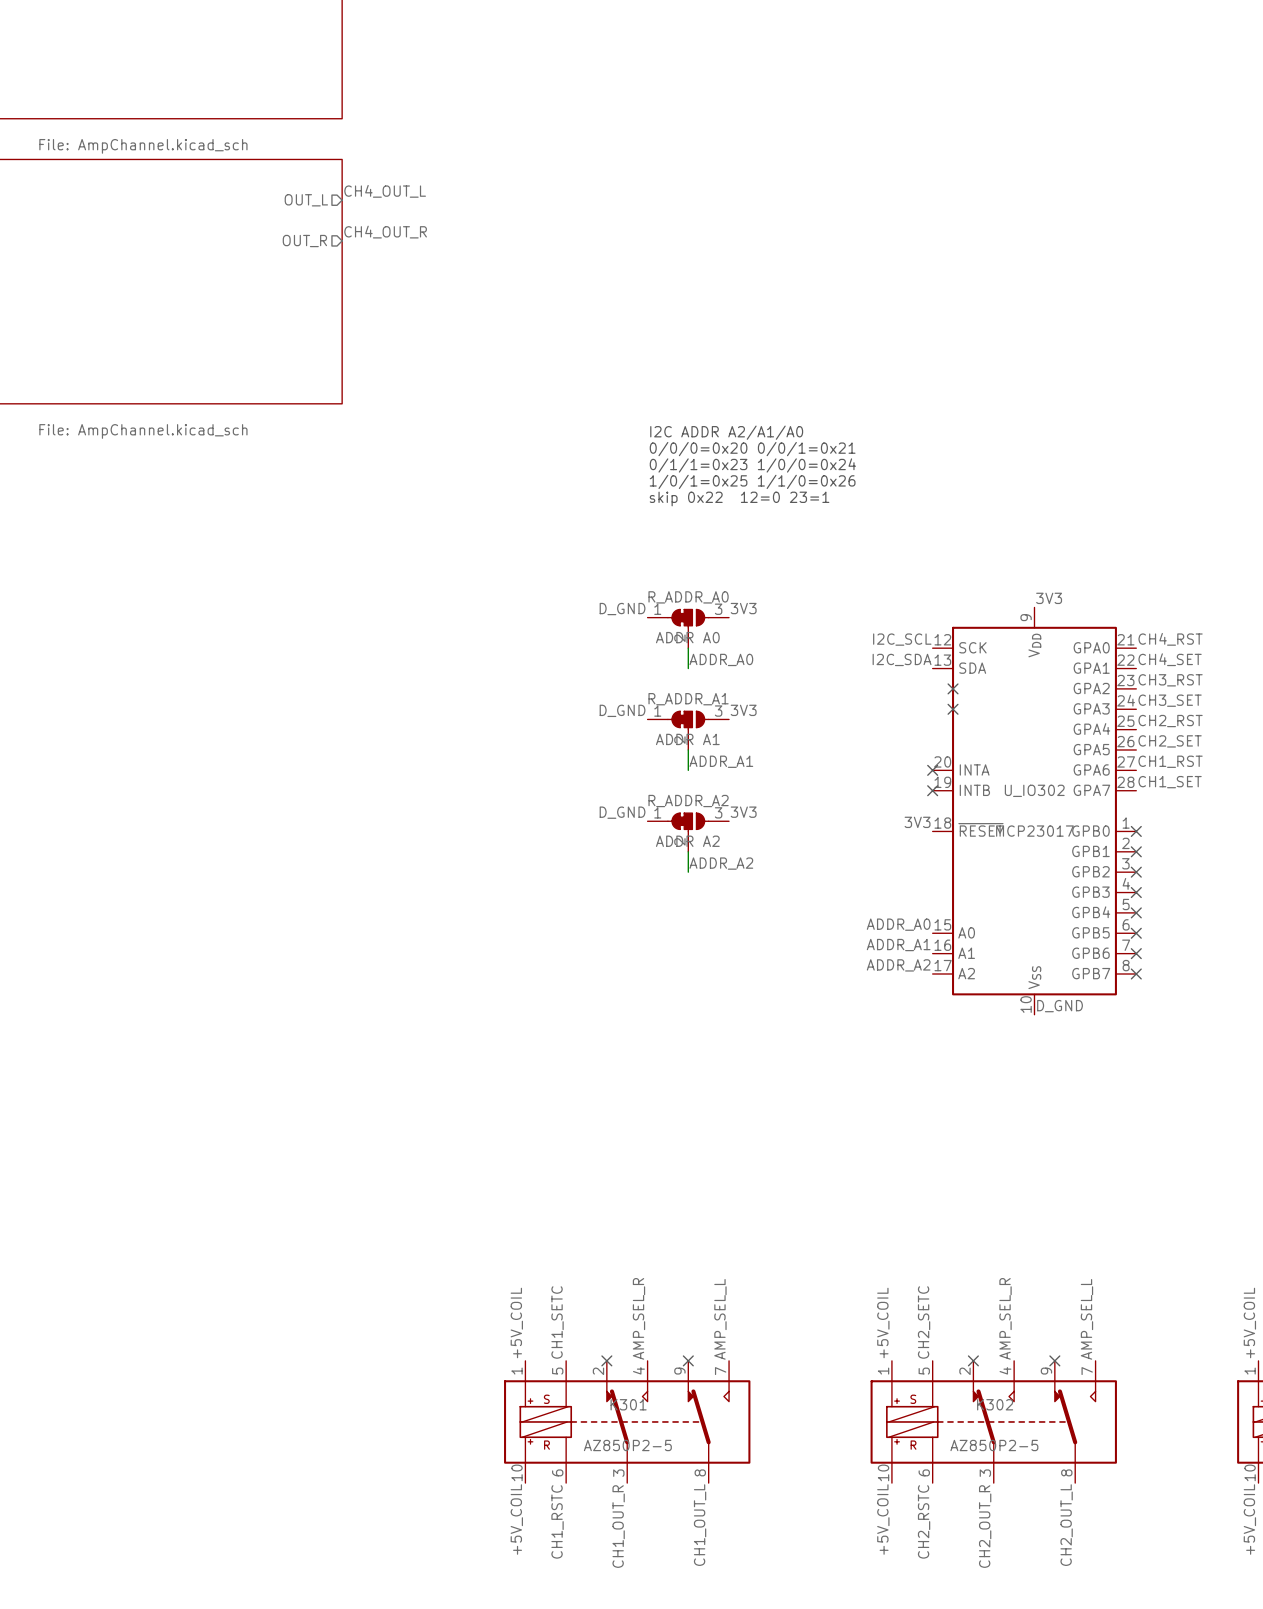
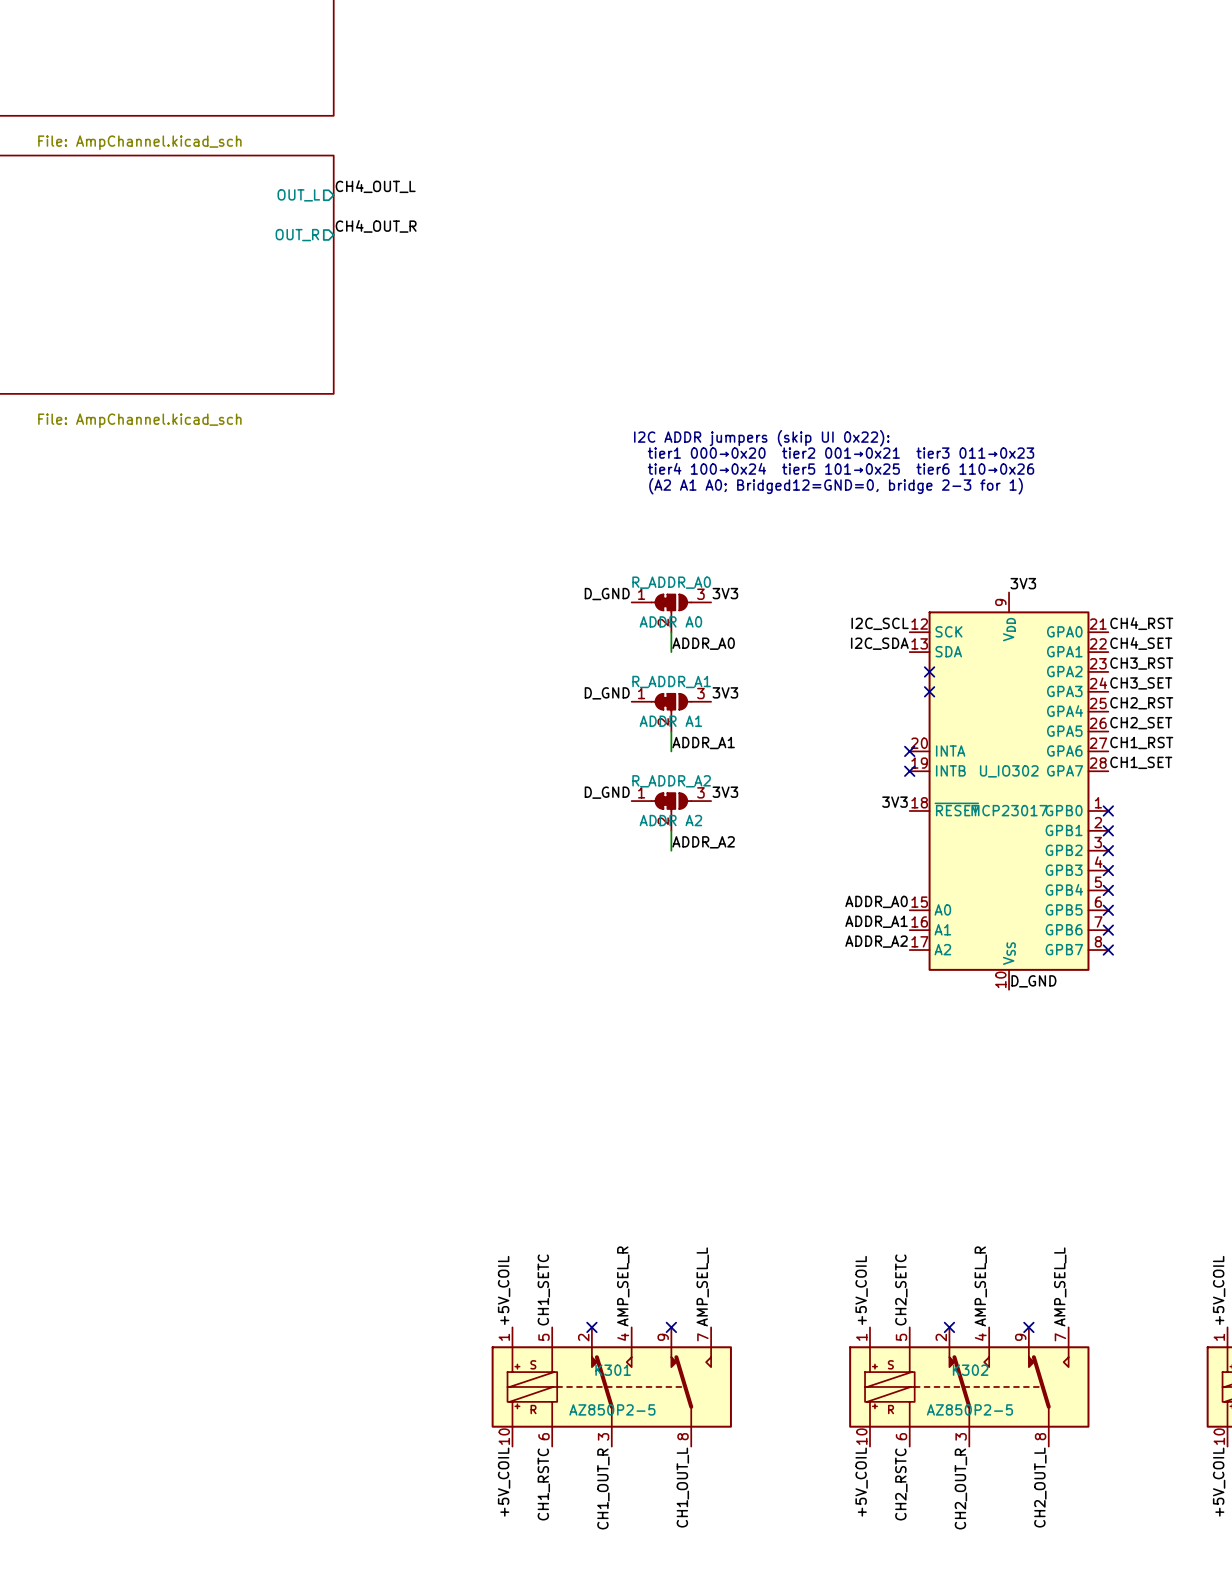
text: I2C ADDR A2/A1/A0 (726, 432) -> none
text: 0/0/0=0x20 0/0/1=0x21 (752, 449) -> I2C ADDR jumpers (skip UI 0x22): (761, 438)
text: 0/1/1=0x23 1/0/0=0x24 (752, 465) -> tier1 000→0x20 tier2 001→0x21 tier3 011→0x23 (840, 453)
text: 1/0/1=0x25 1/1/0=0x26 (752, 481) -> tier4 100→0x24 tier5 101→0x25 tier6 110→0x26 (840, 468)
text: skip 0x22 12=0 23=1 (739, 498) -> (A2 A1 A0; Bridged12=GND=0, bridge 2-3 for 1) (836, 486)

